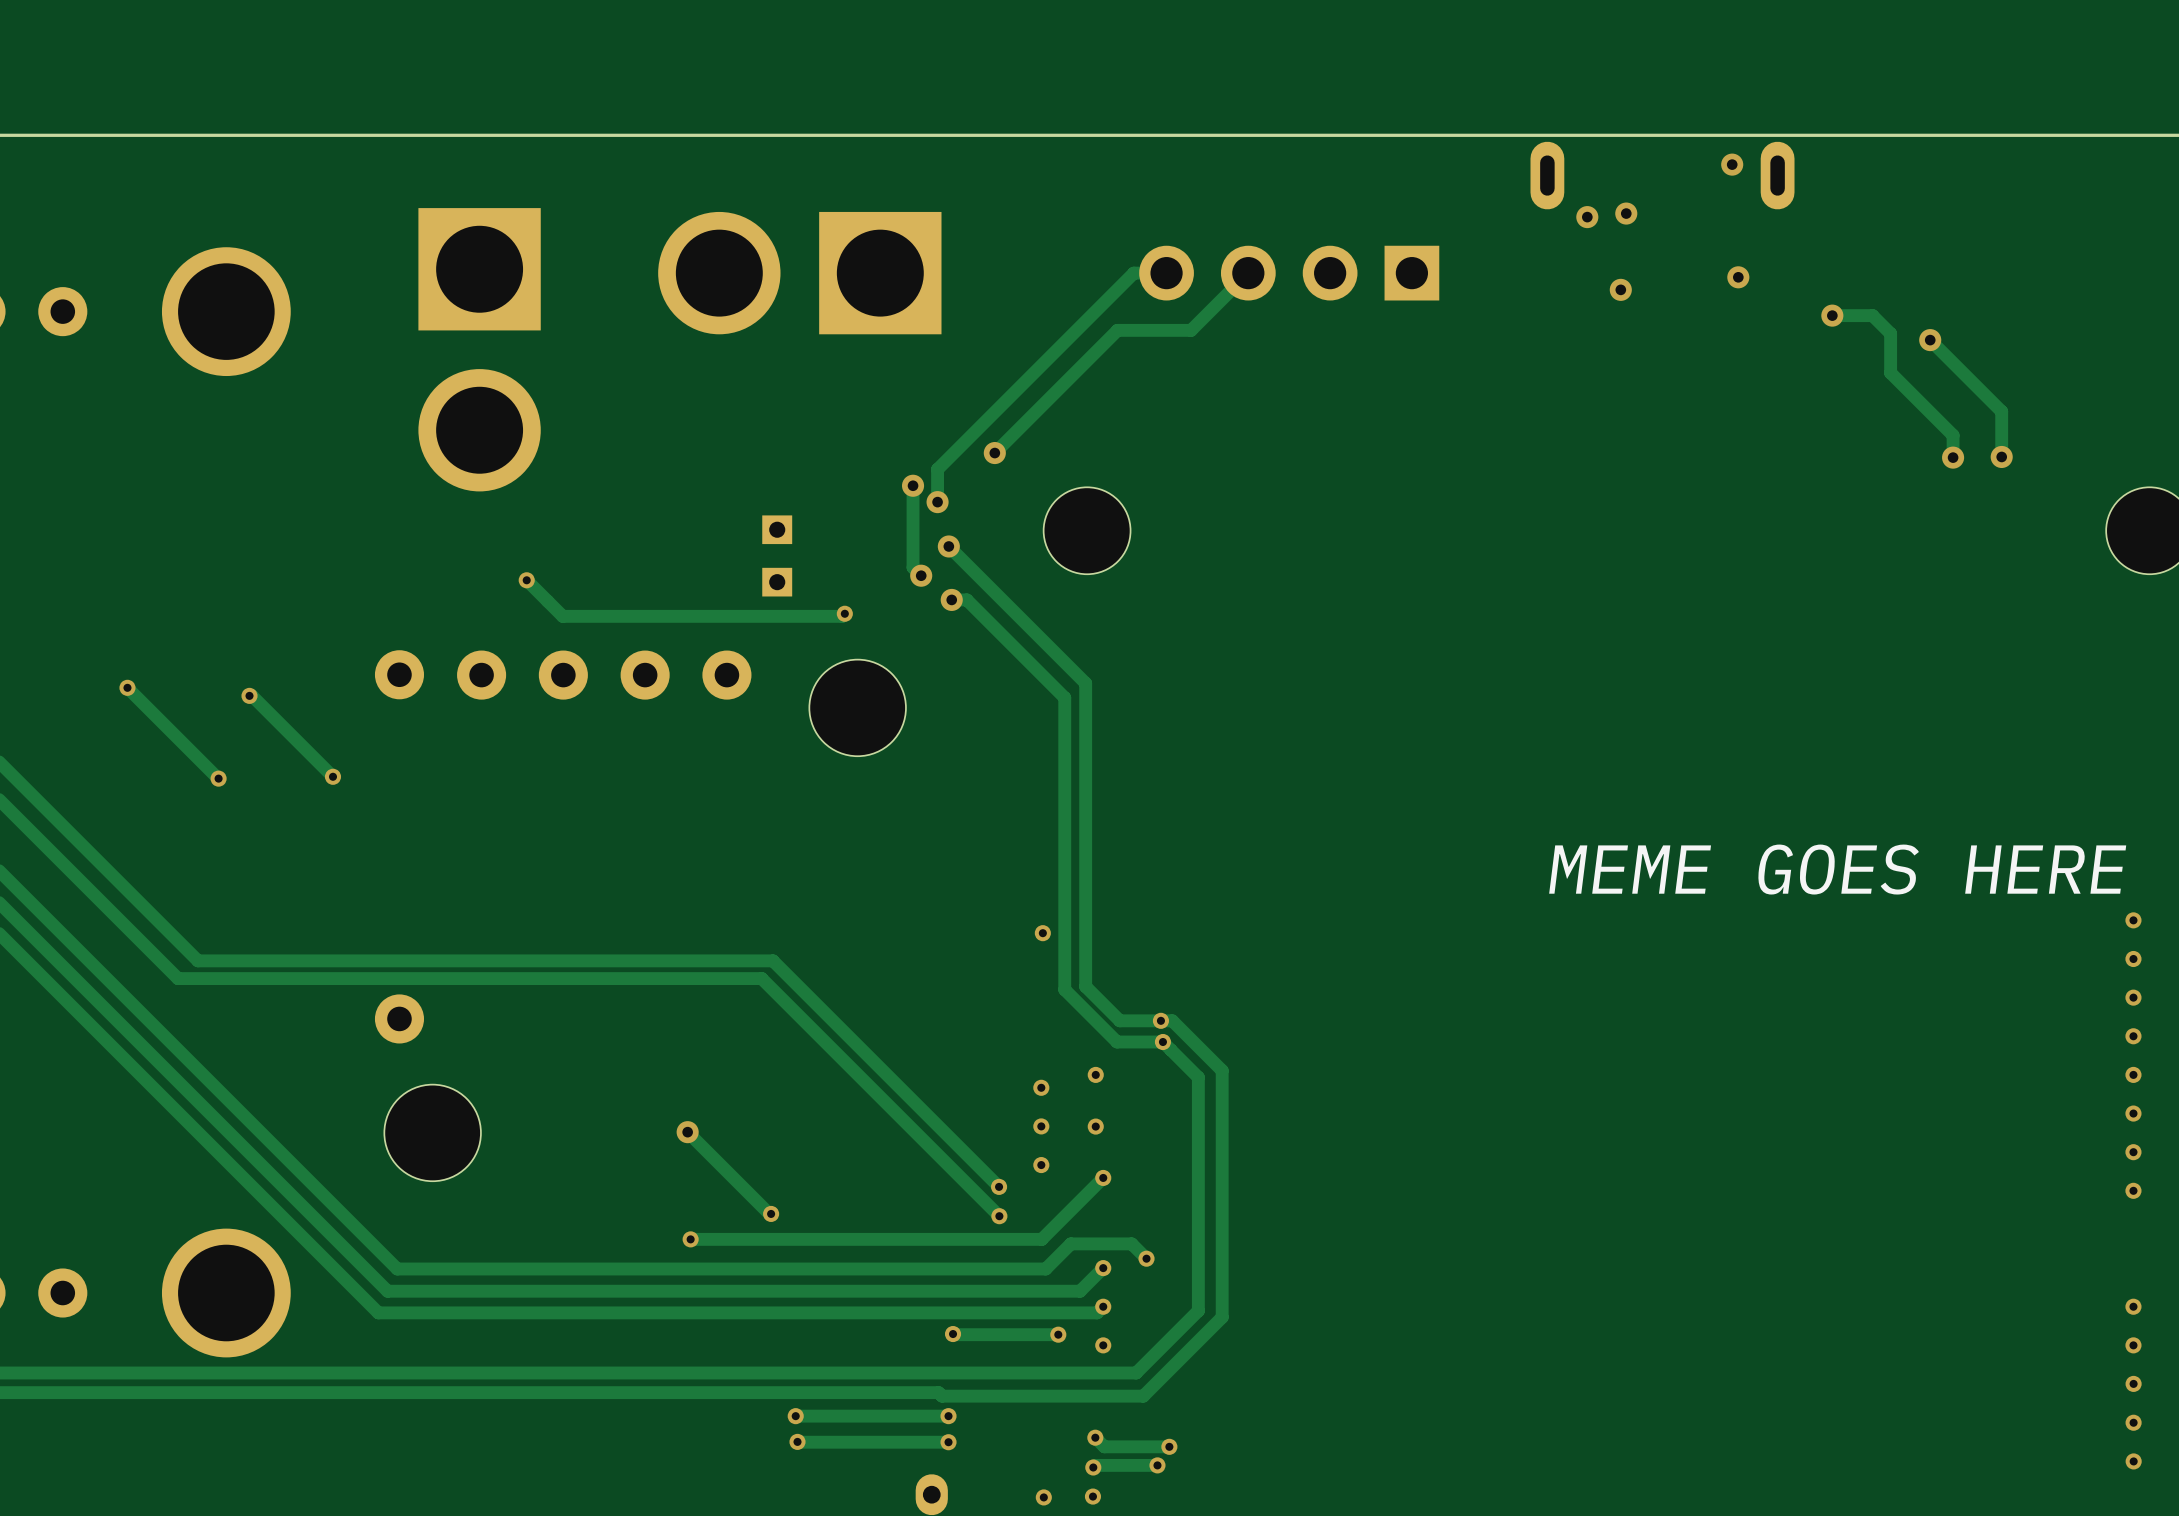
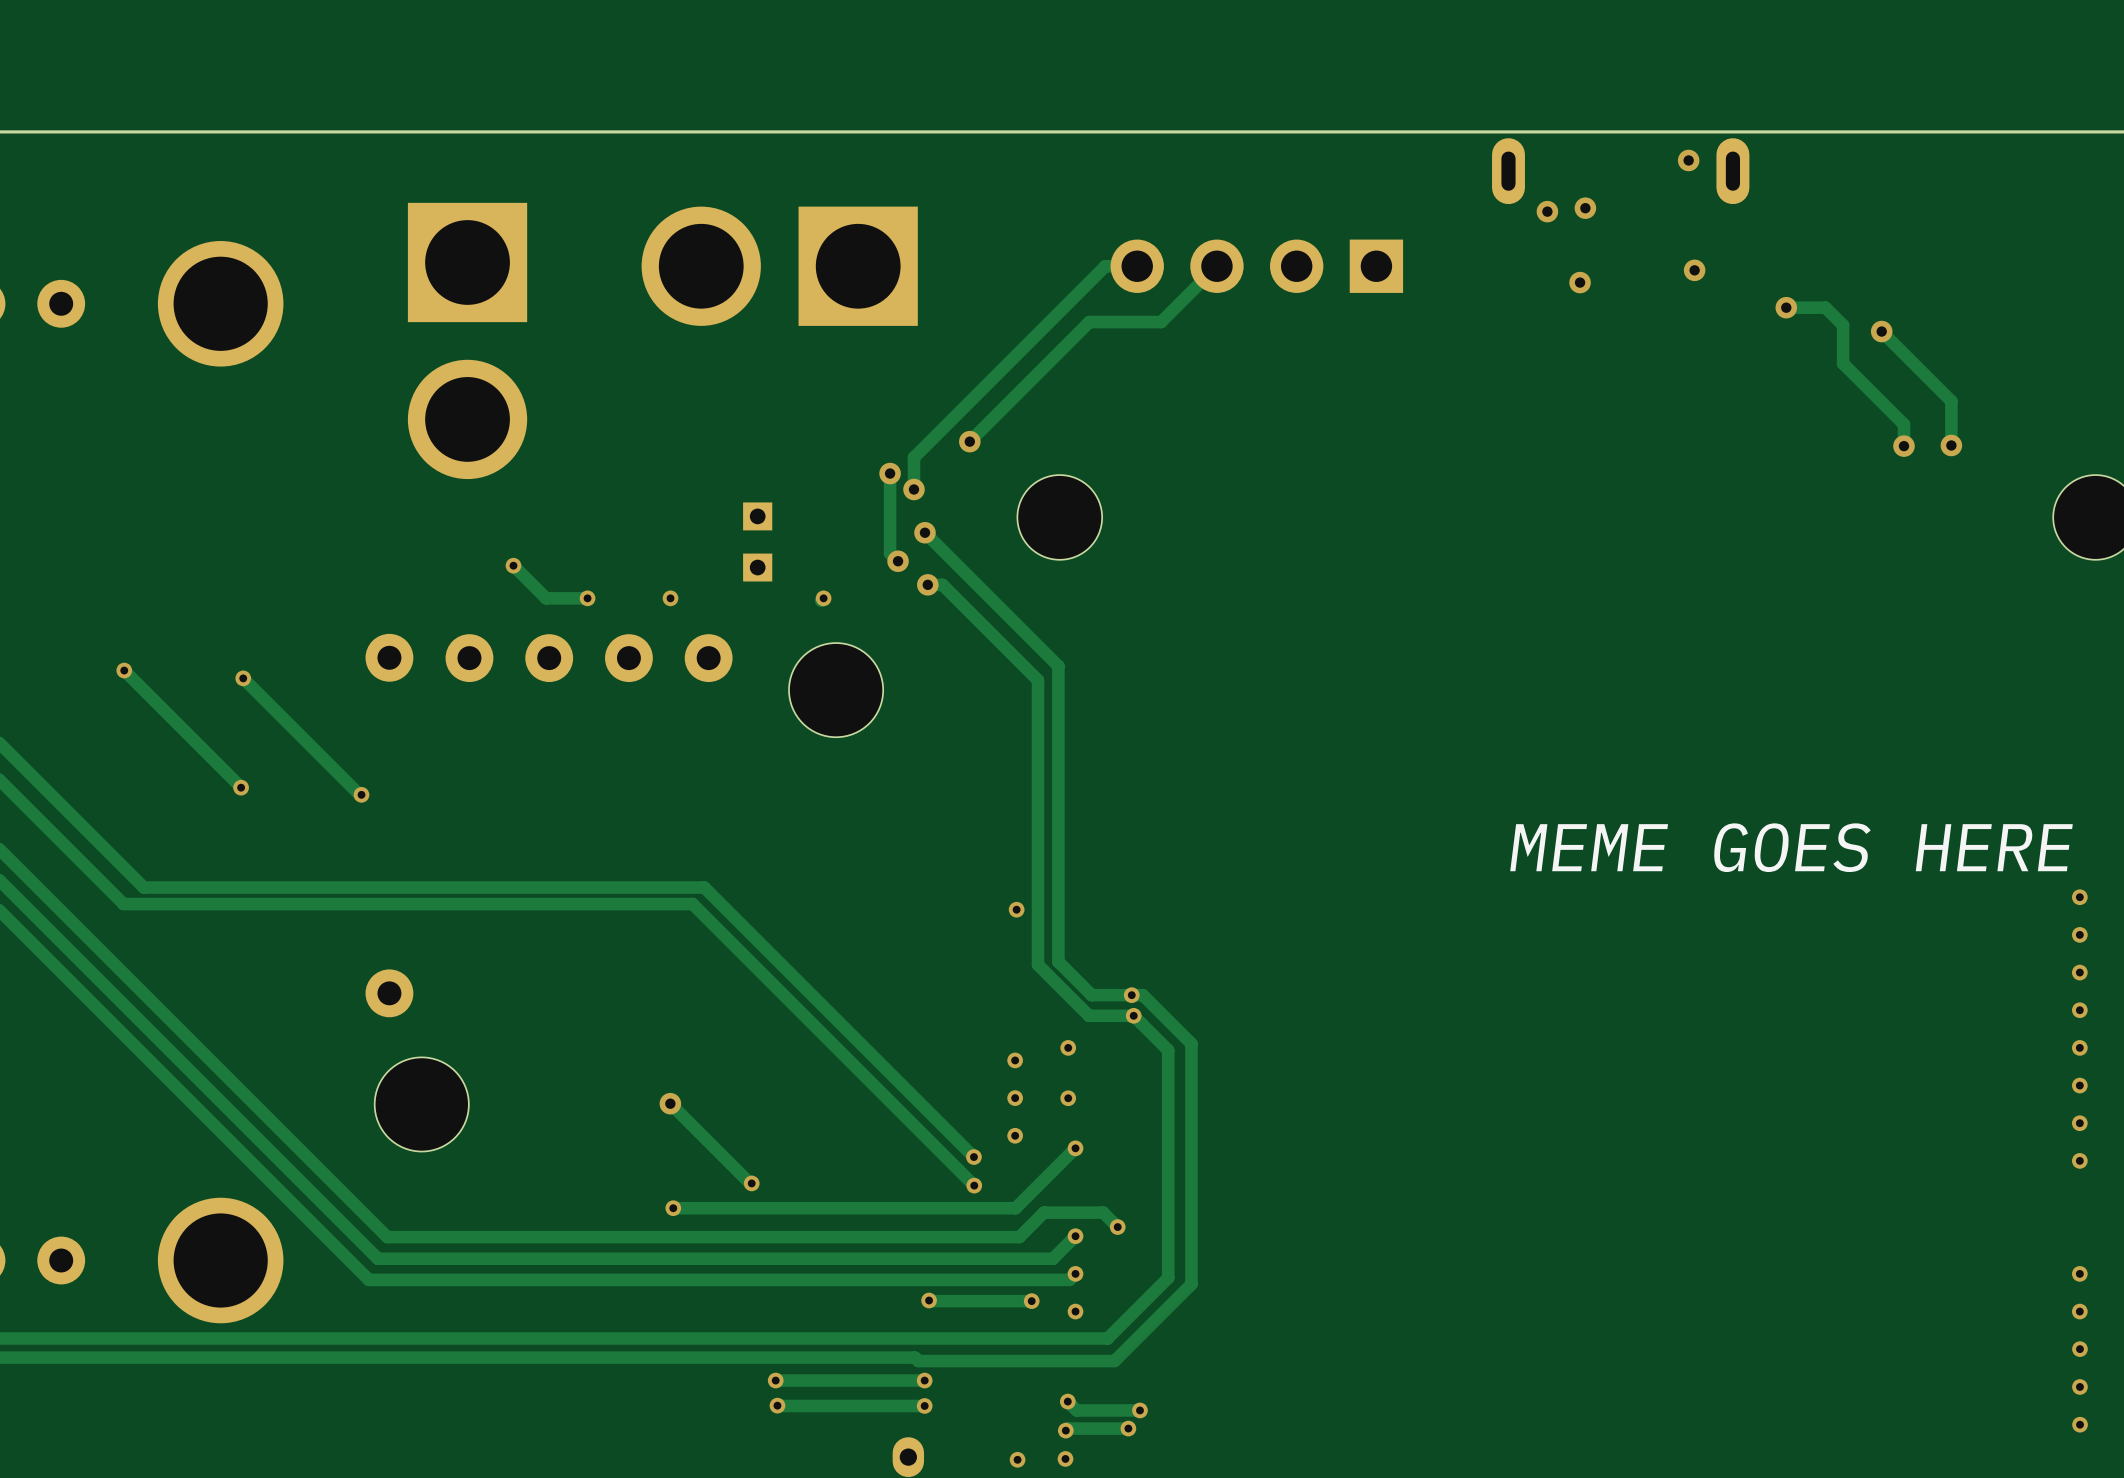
track: (560, 613) (562, 616) (842, 616) -> (546, 598) (587, 598)
via: none -> (587, 598)
via: none -> (670, 598)
track: (249, 695) (252, 695) (332, 776) -> (243, 678) (361, 794)
via: (332, 776) -> none
track: none -> (212, 759) (241, 787)
via position: (218, 778) -> (241, 787)
via: none -> (361, 794)
track: (147, 910) (197, 960) (773, 960) -> (143, 887) (704, 887) (753, 936)
track: (126, 927) (178, 978) (761, 978) -> (123, 904) (692, 904) (742, 953)

